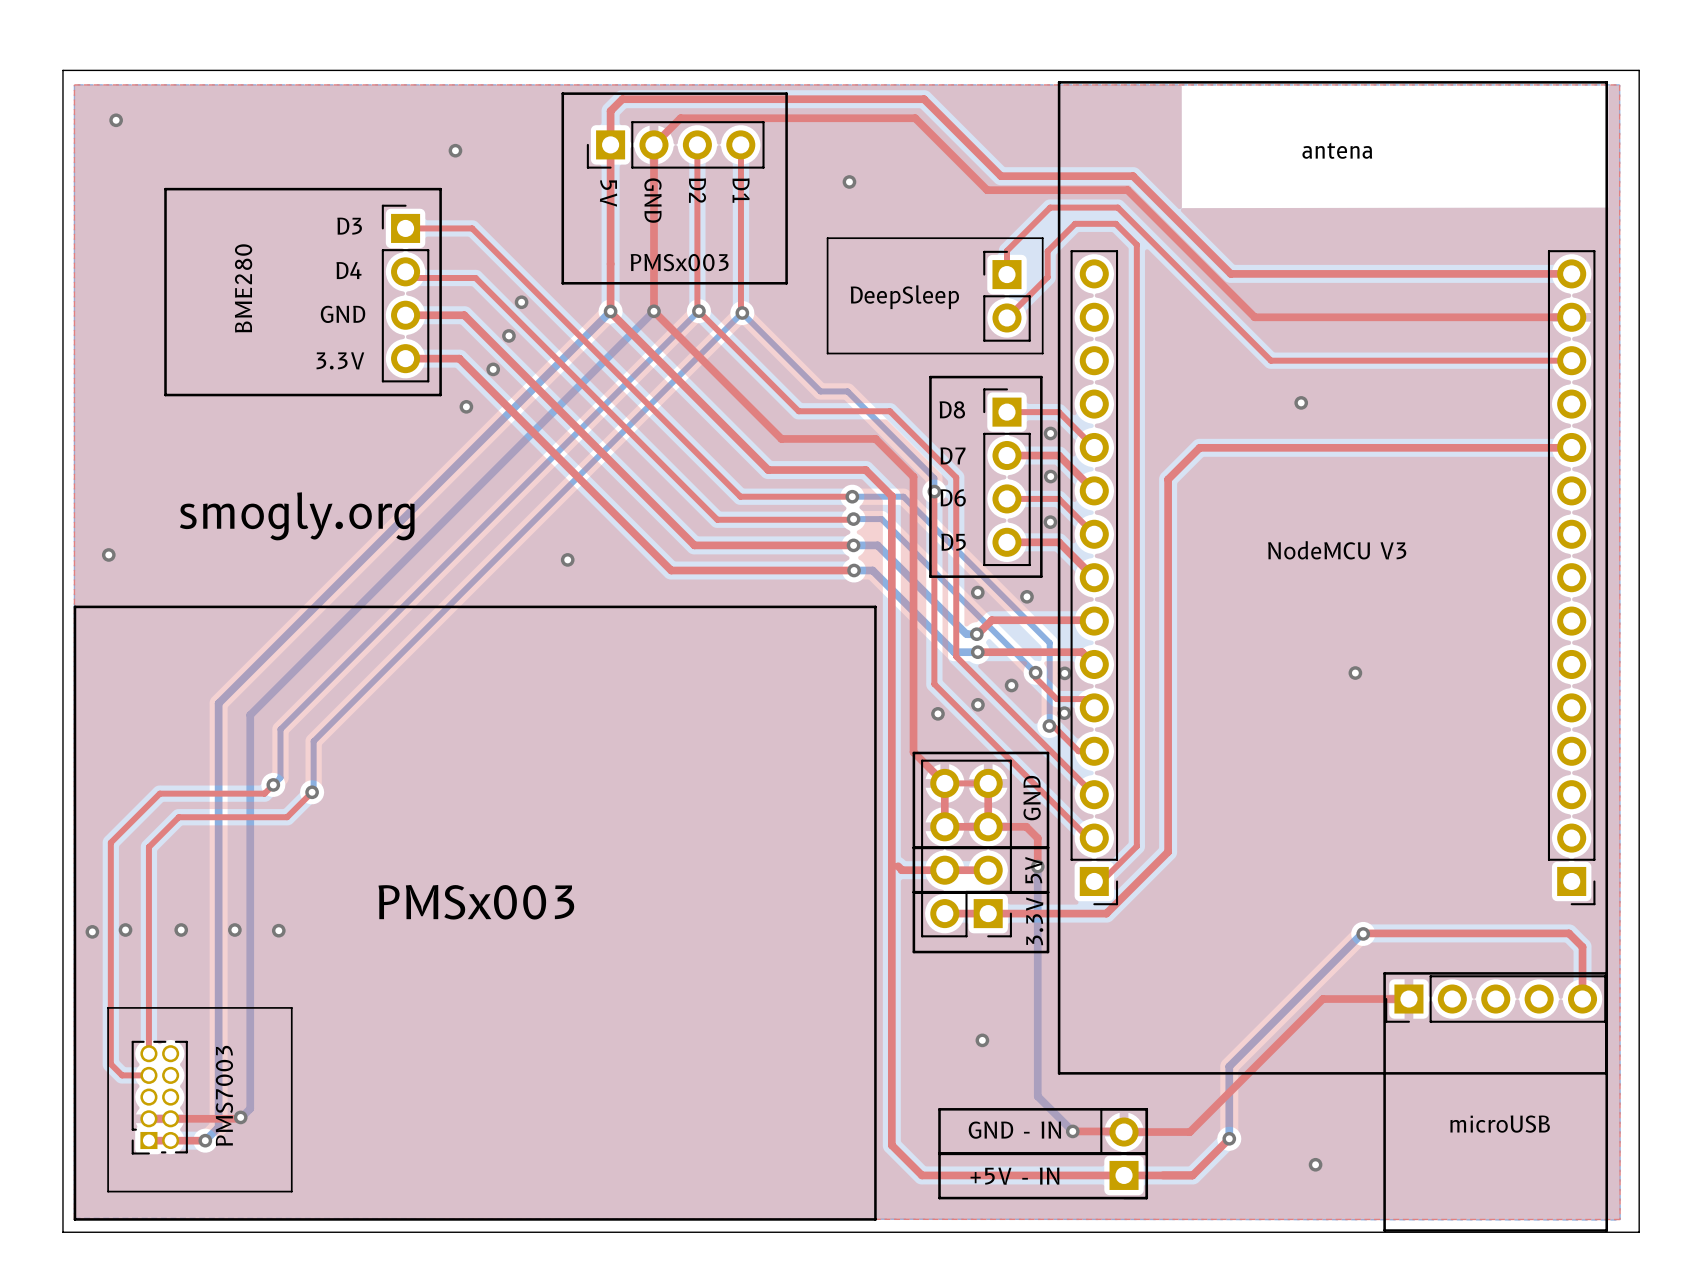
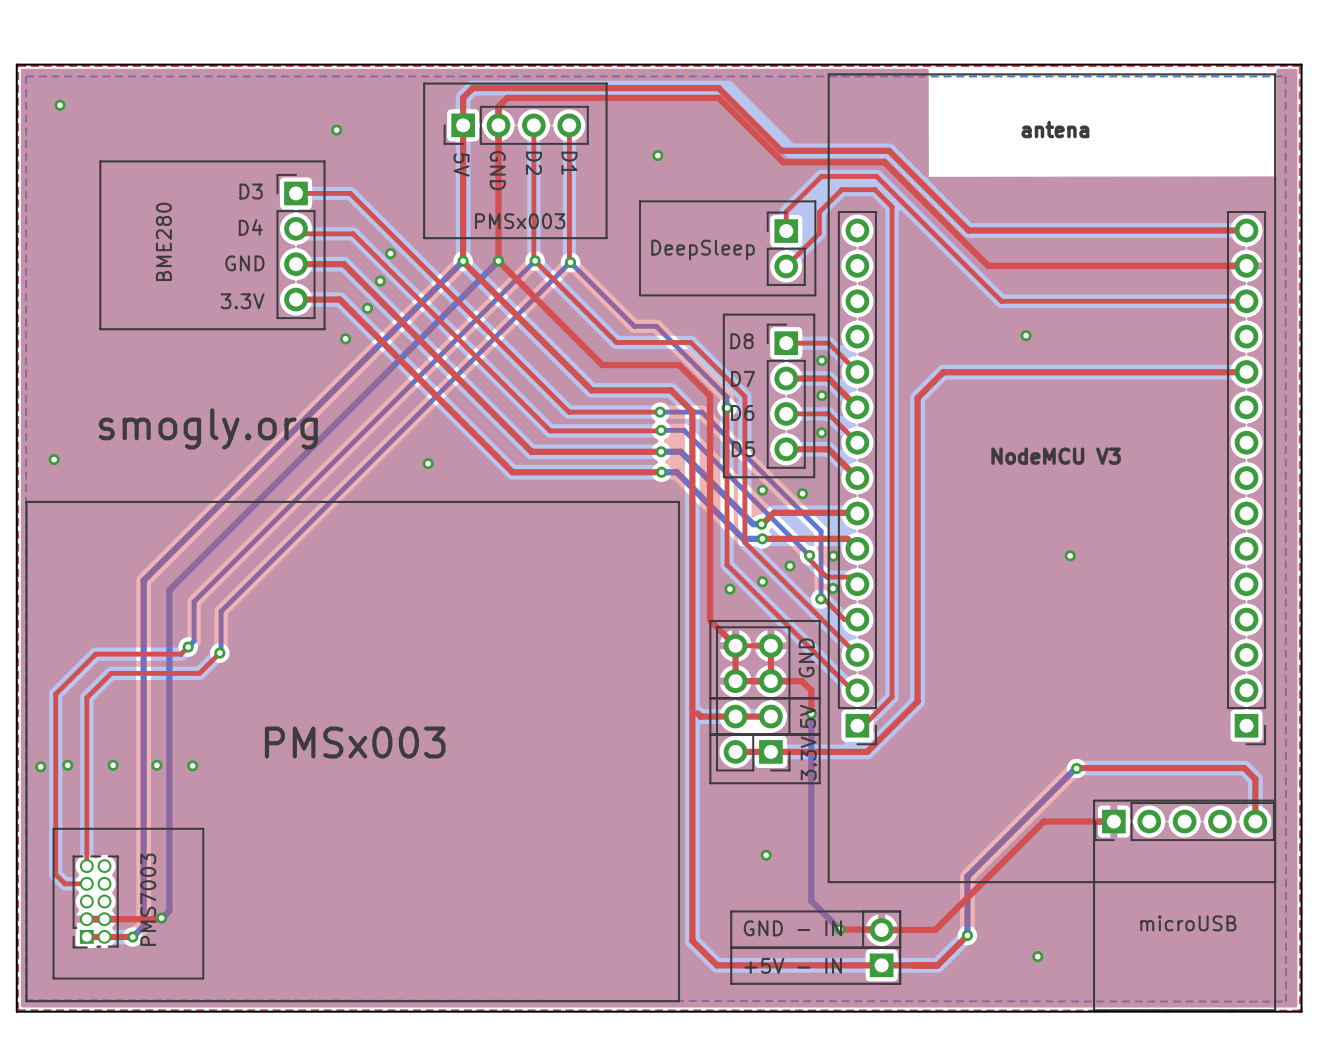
top zone outline: (74, 84) (1619, 84) (1620, 1219) (74, 1219) (74, 84) -> (18, 66) (18, 1010) (1300, 1010) (1299, 66) (18, 66)
top track: (653, 144) (680, 118) (915, 118) (987, 190) (1003, 190) -> (498, 125) (498, 106) (507, 97) (718, 97) (783, 162)

